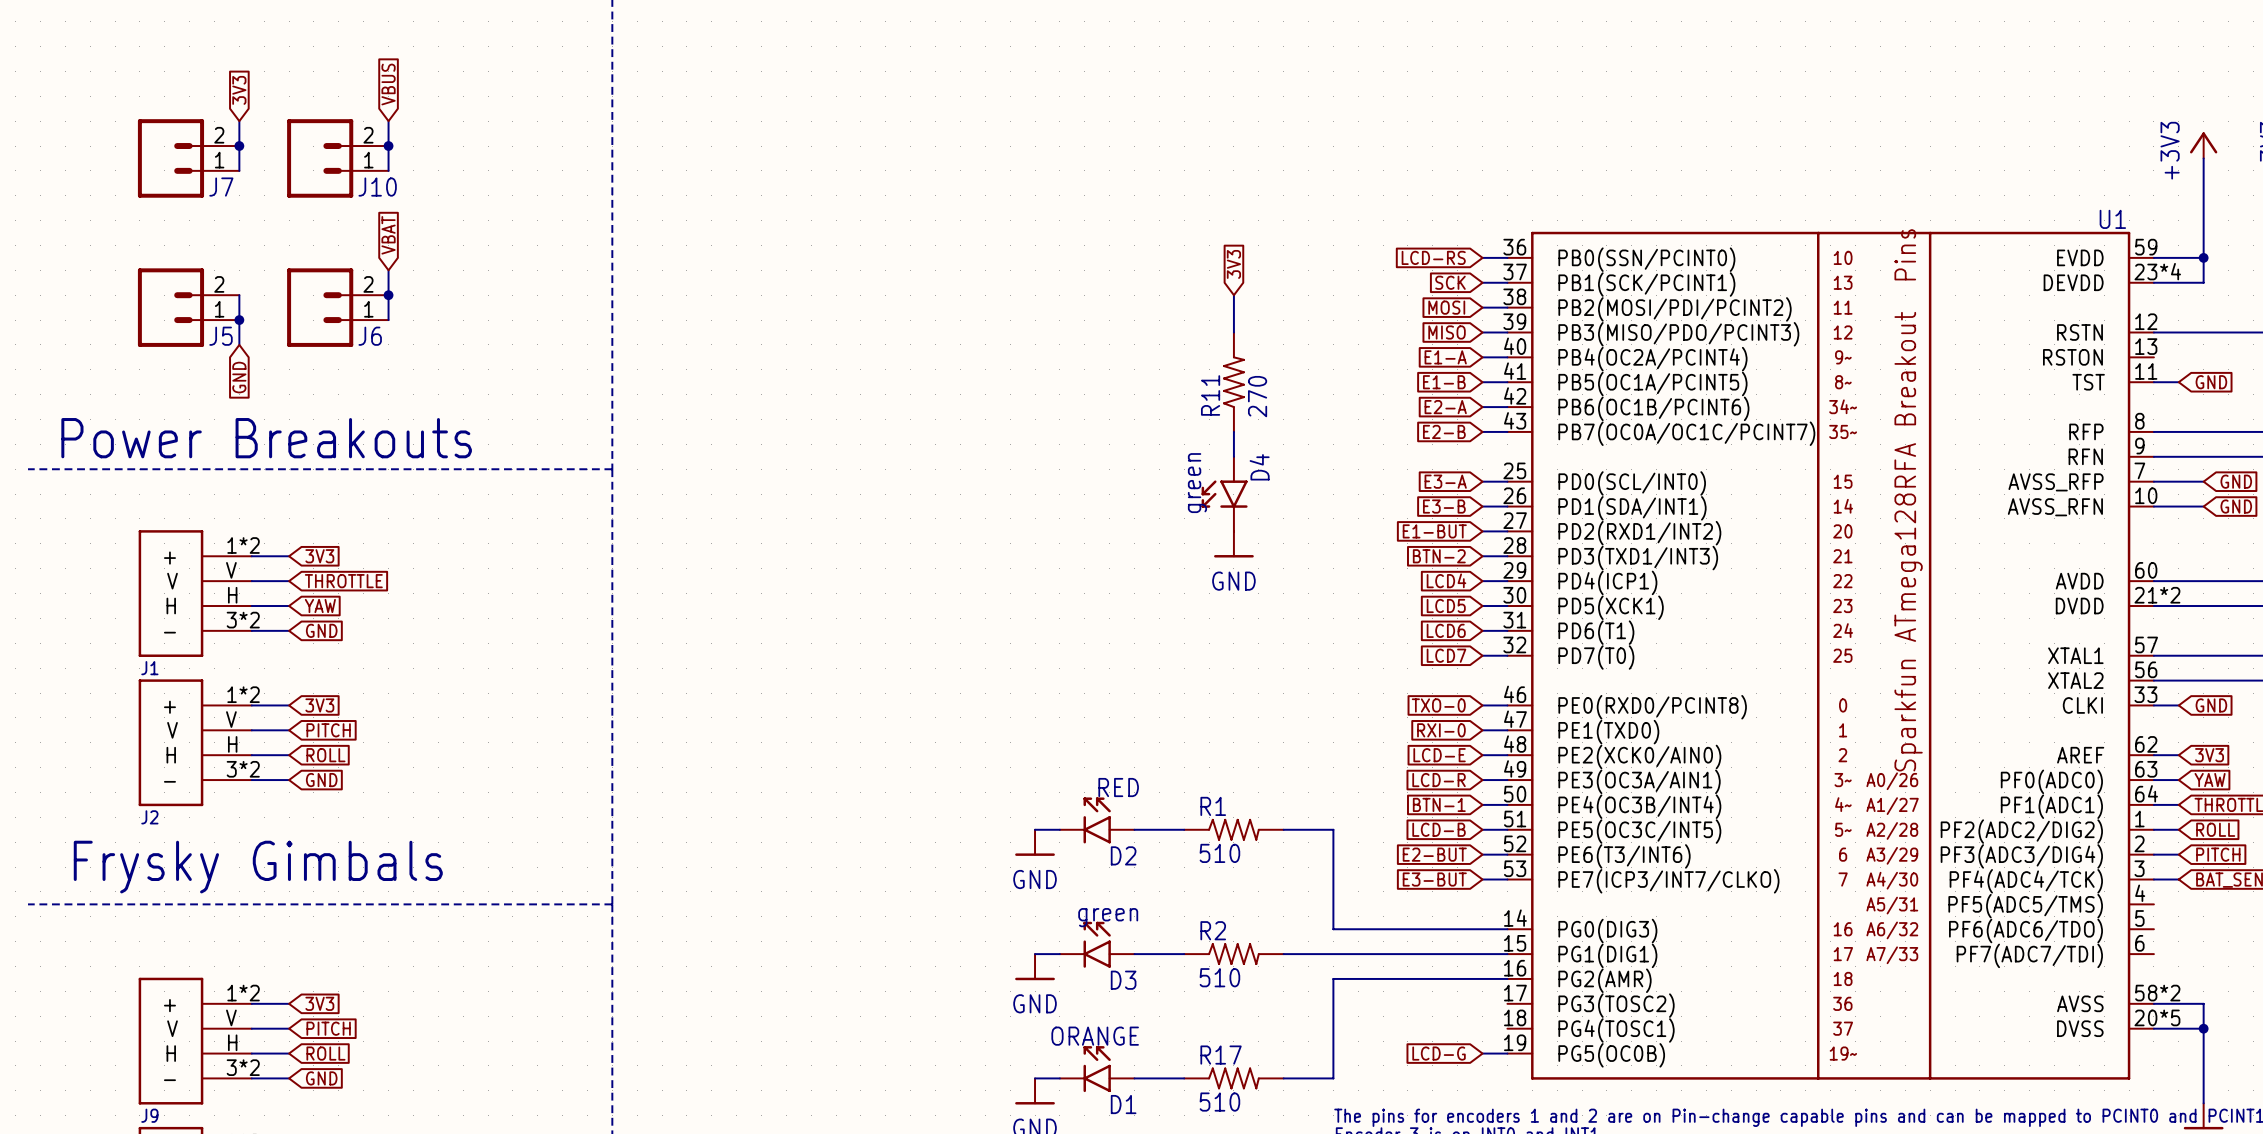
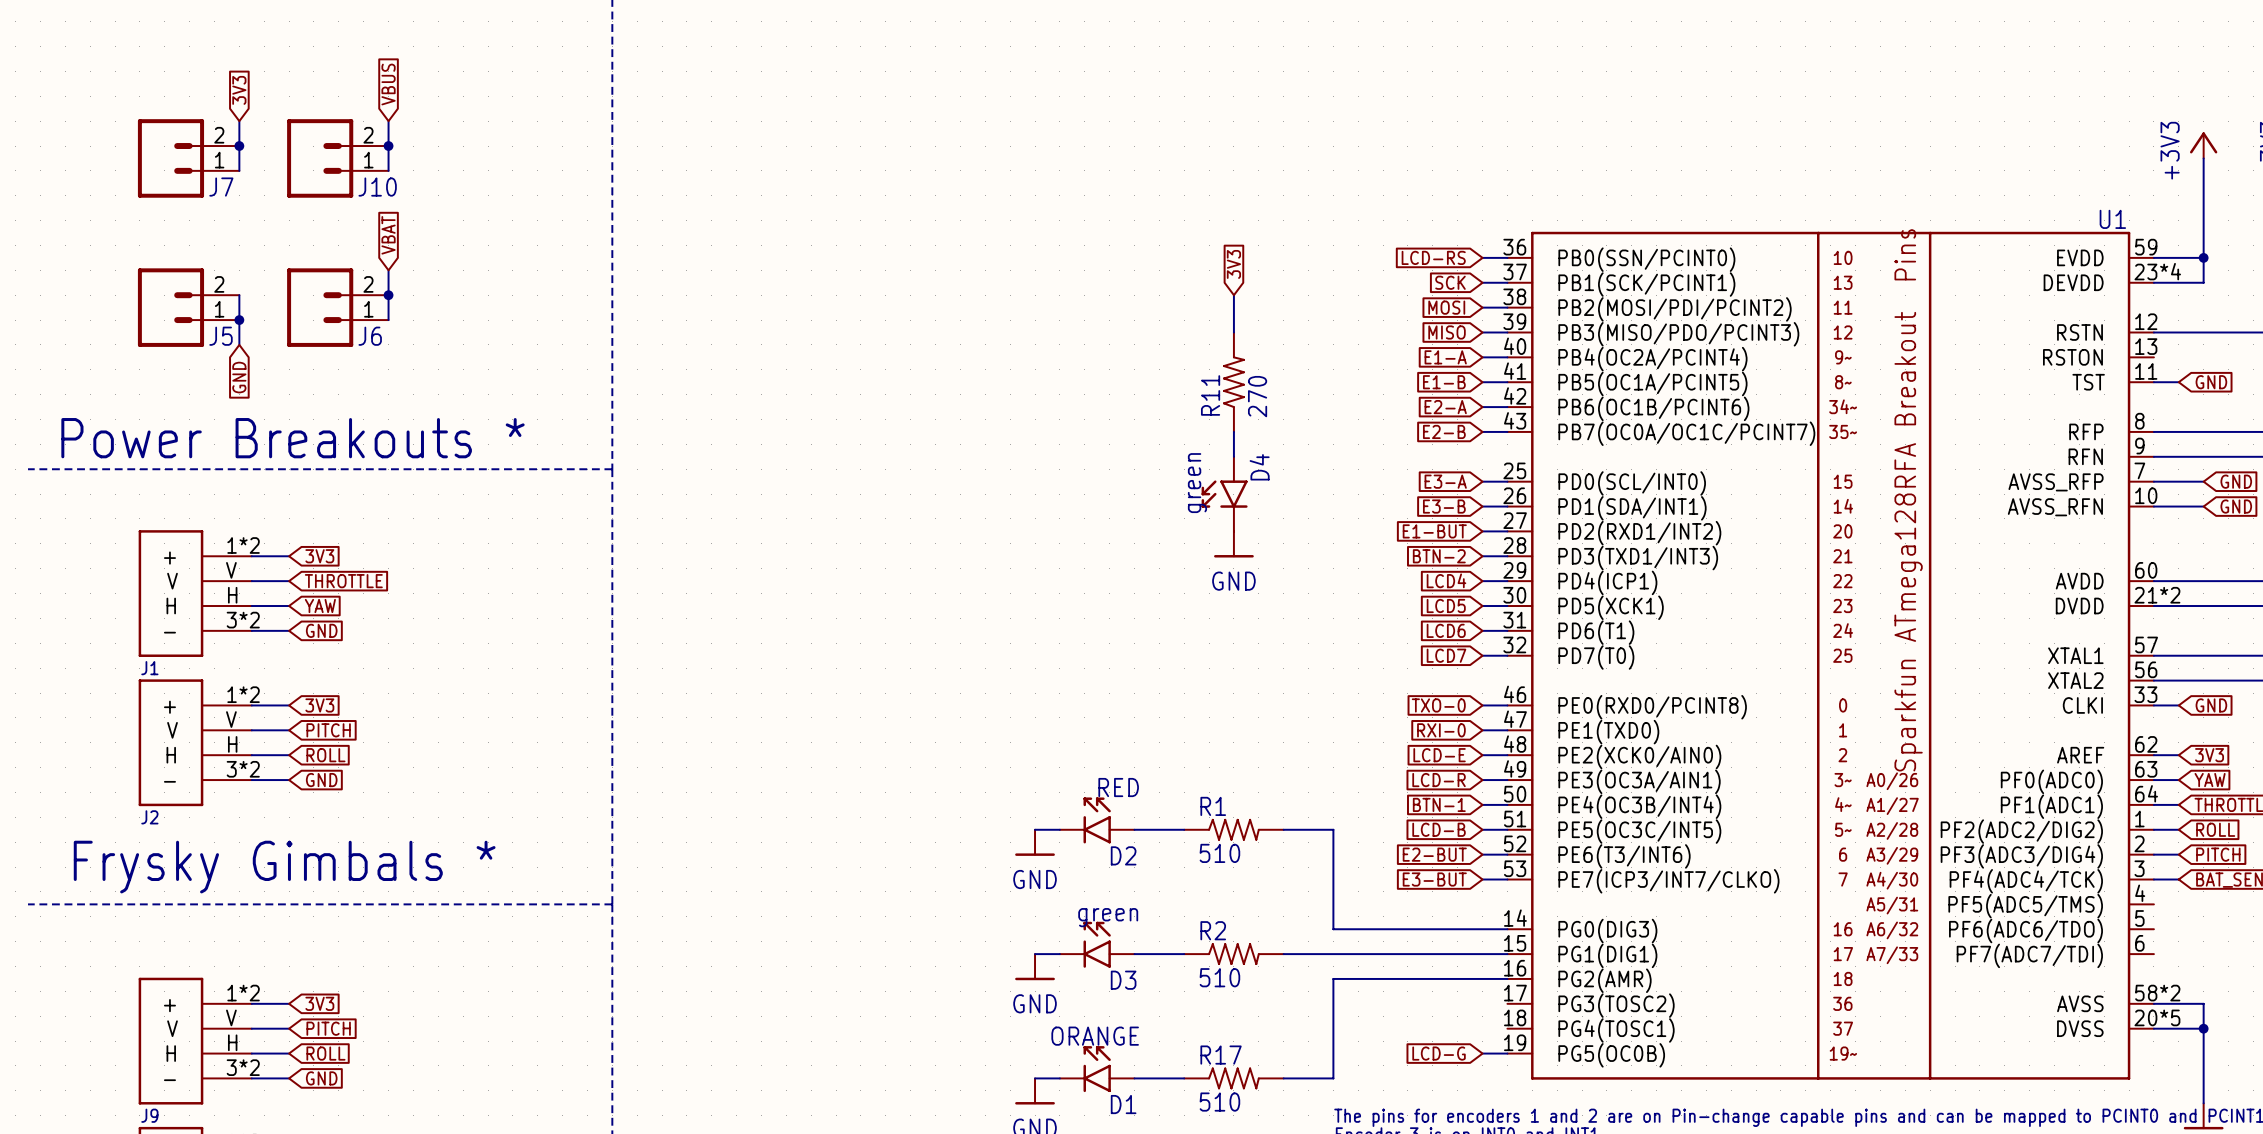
text: Power Breakouts (266, 438) -> Power Breakouts * (293, 438)
text: Frysky Gimbals (258, 867) -> Frysky Gimbals * (284, 867)

